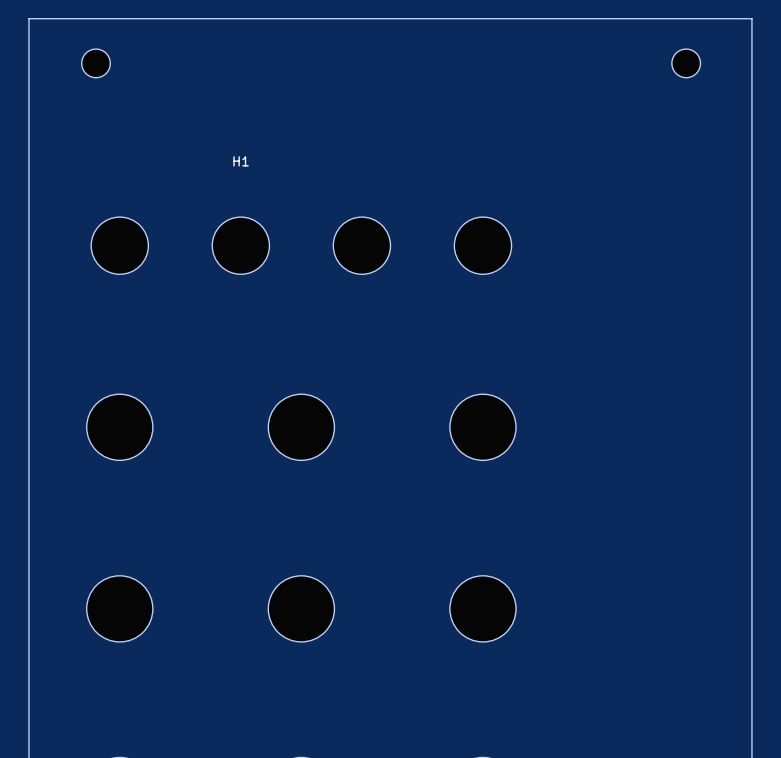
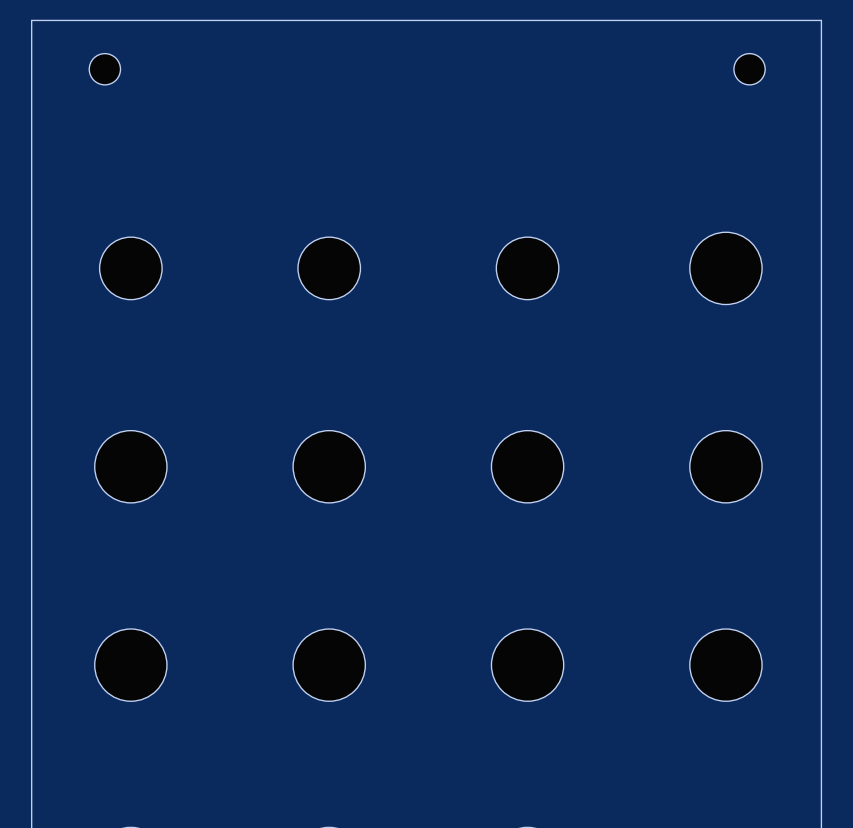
H1: (240, 245) -> none
part position: (361, 245) -> (329, 268)
part: none -> (725, 268)
part: none -> (725, 466)
part: none -> (725, 665)

